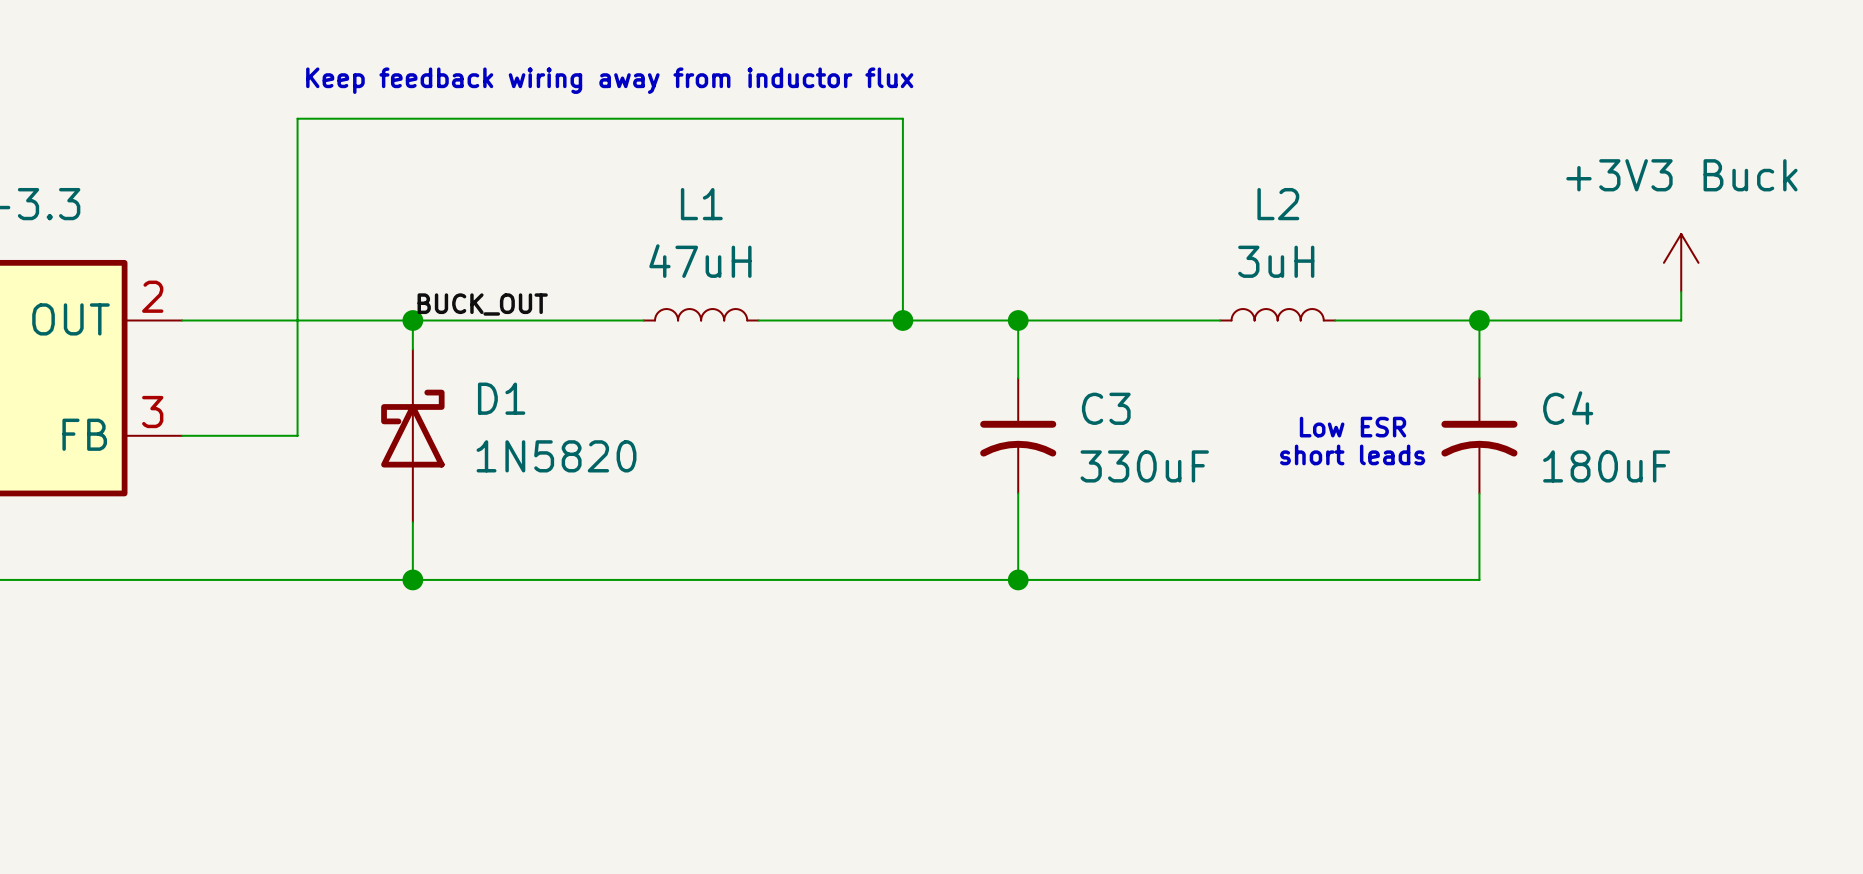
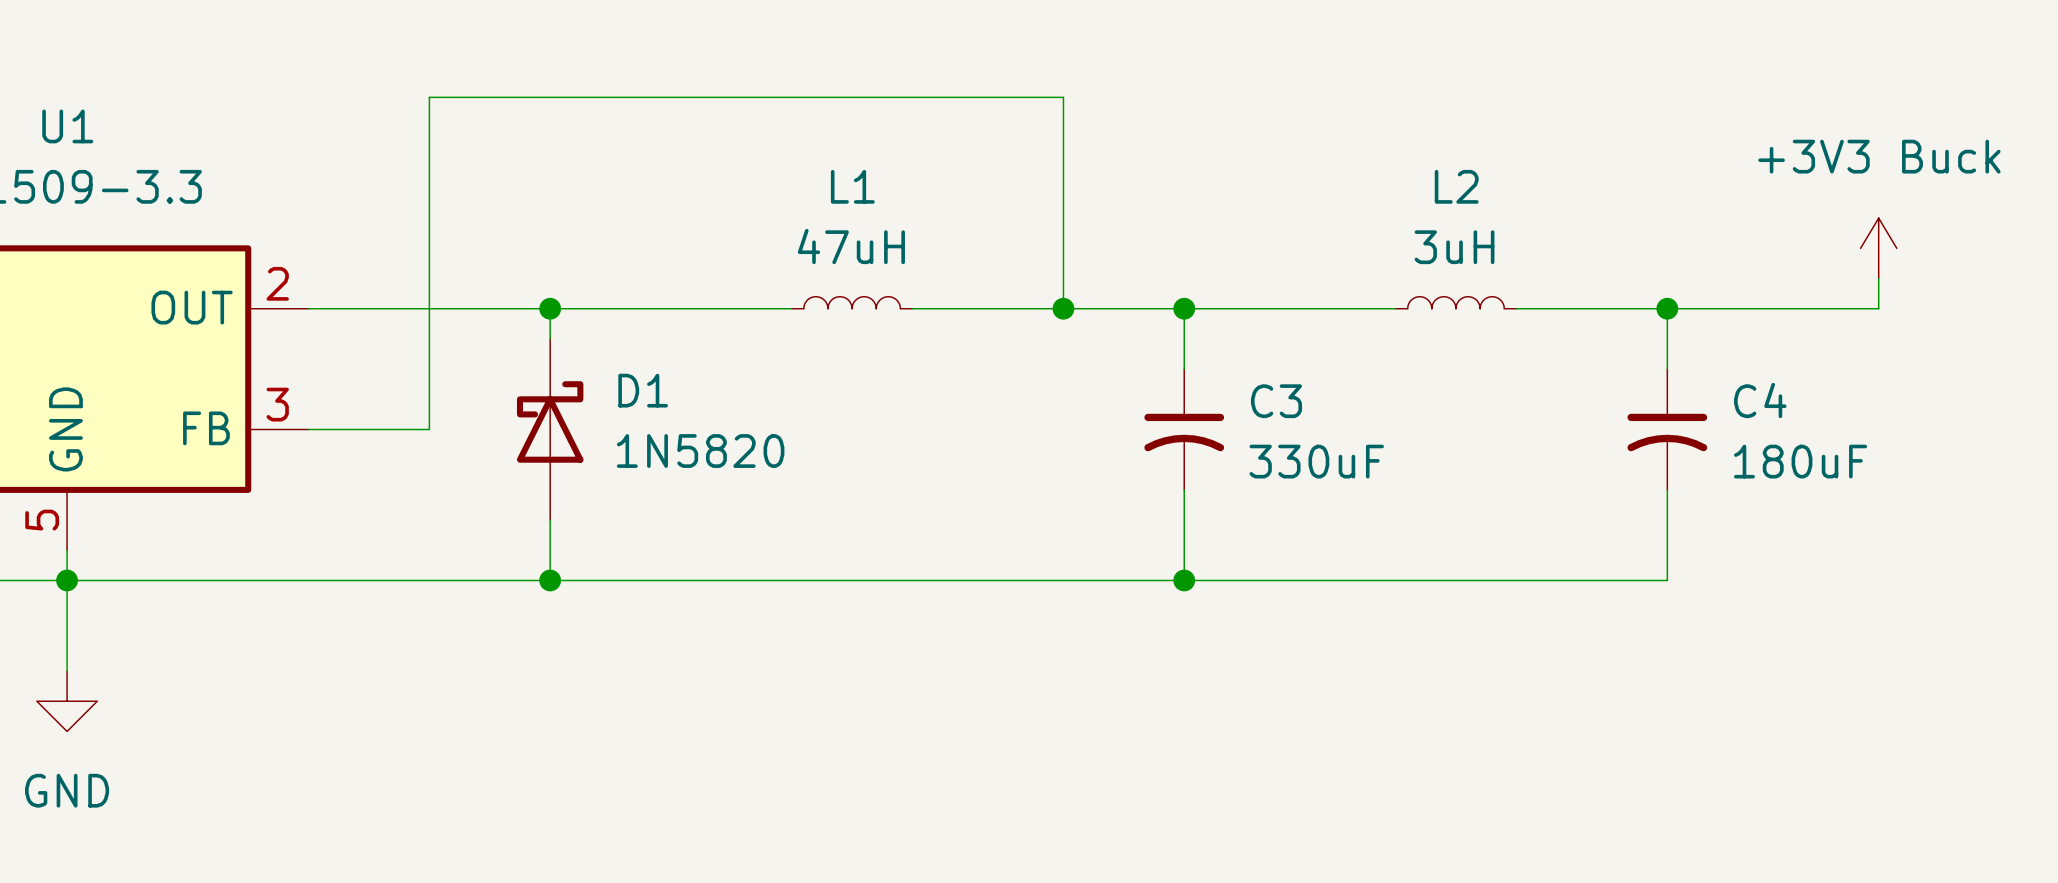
text: Keep feedback wiring away from inductor flux (609, 80) -> none
label: BUCK_OUT (482, 304) -> none
text: Low ESR (1353, 427) -> none
text: short leads (1352, 454) -> none

